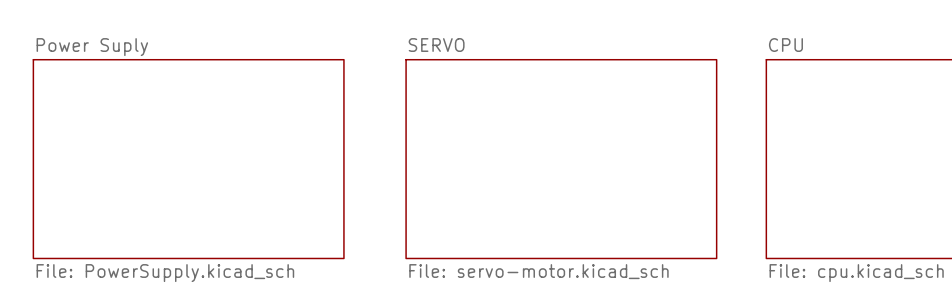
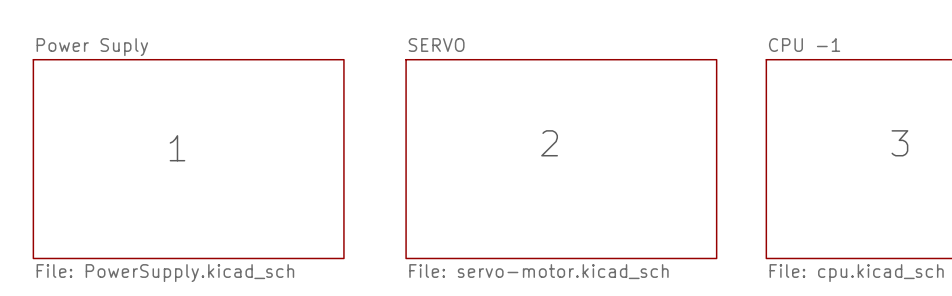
sheet CPU name: CPU (785, 45) -> CPU -1 (804, 45)
text: none -> 2 (549, 143)
text: none -> 3 (899, 143)
text: none -> 1 (177, 148)

